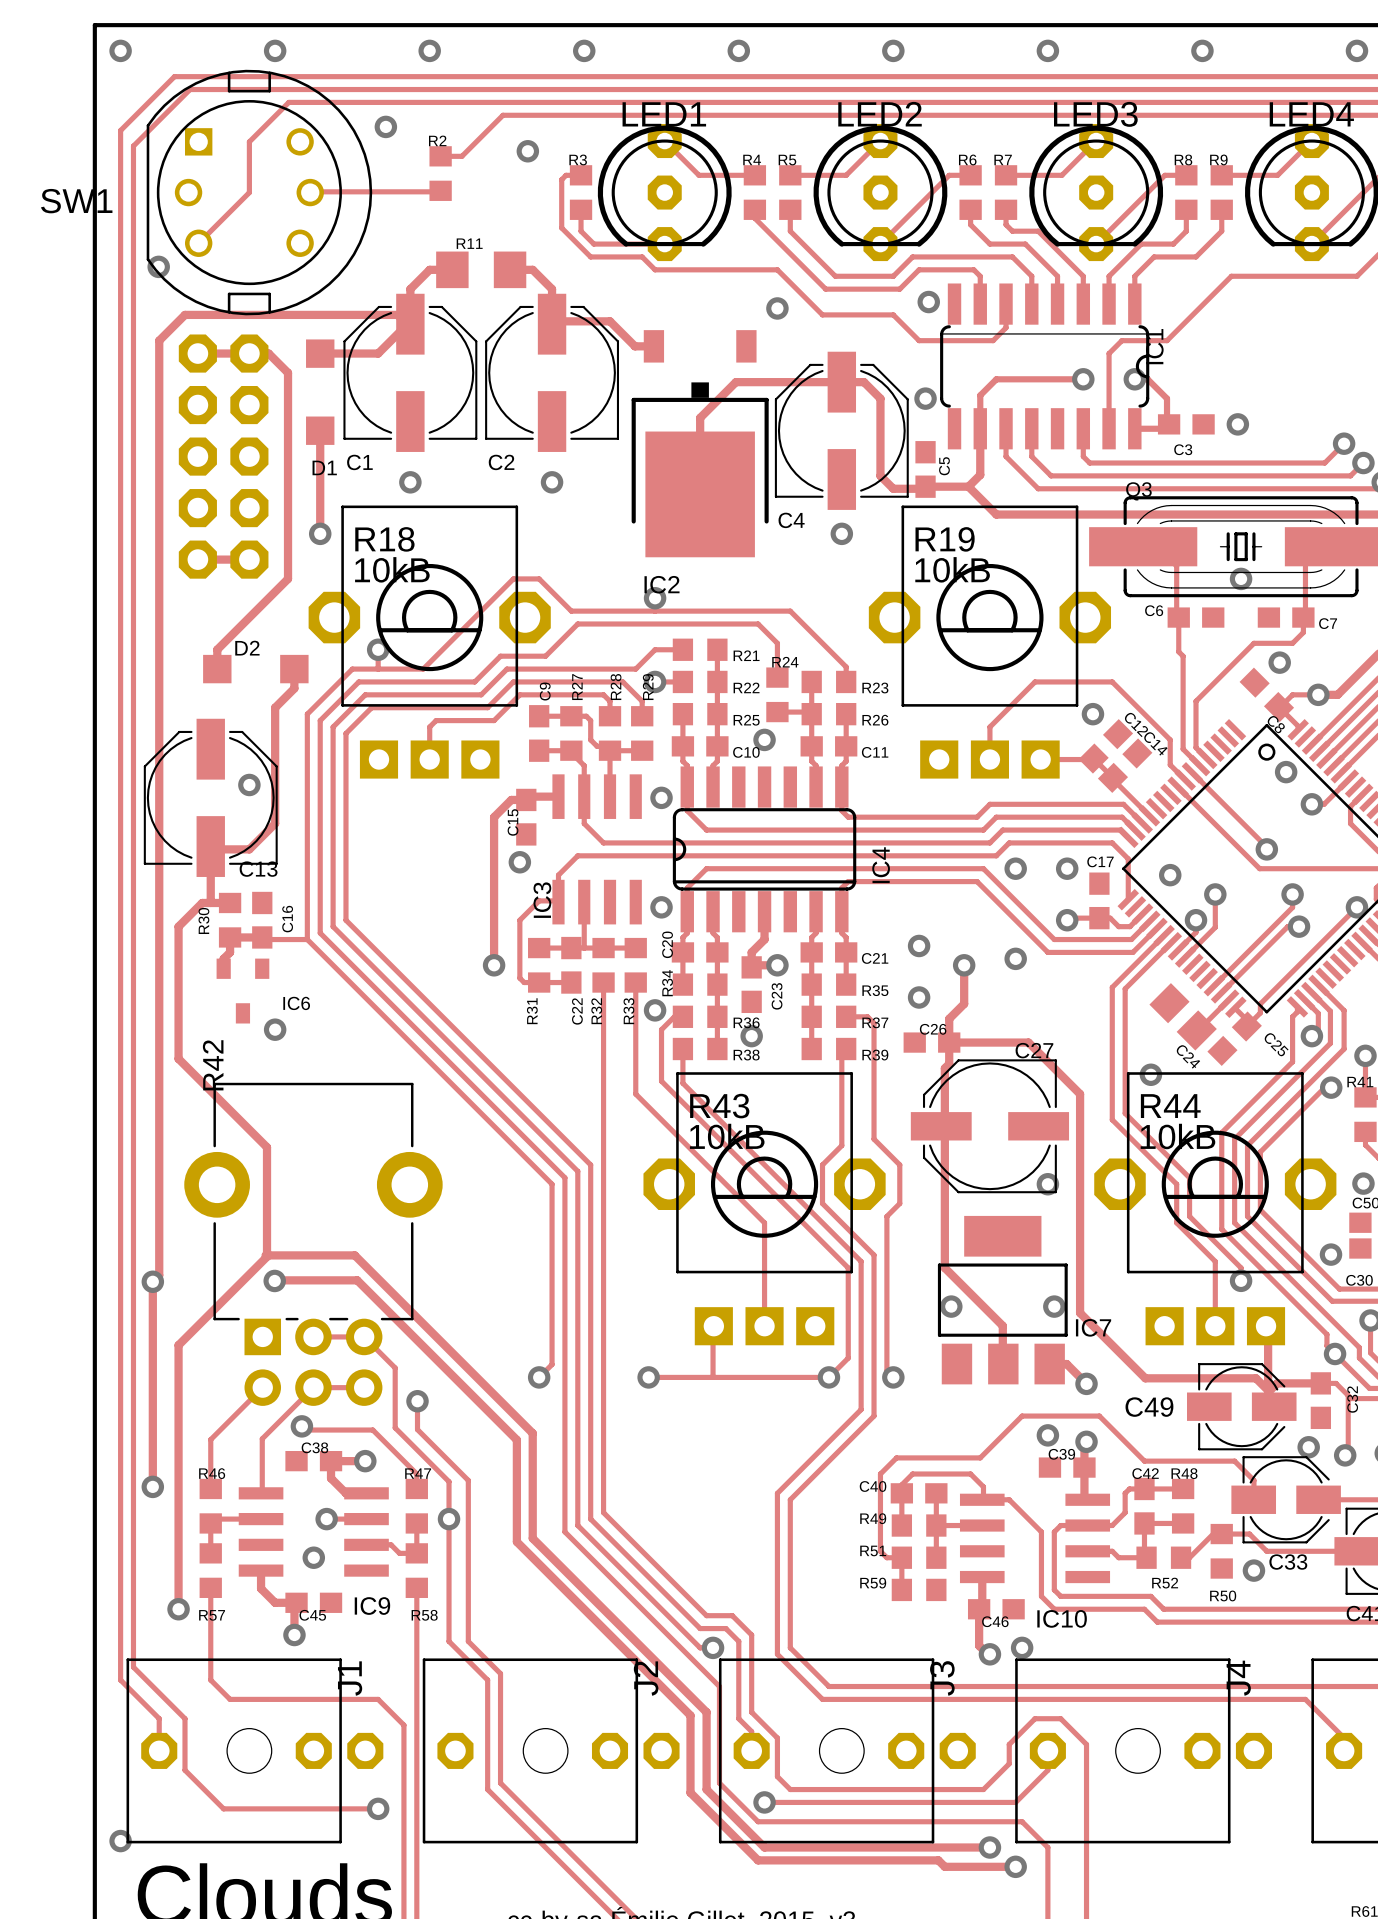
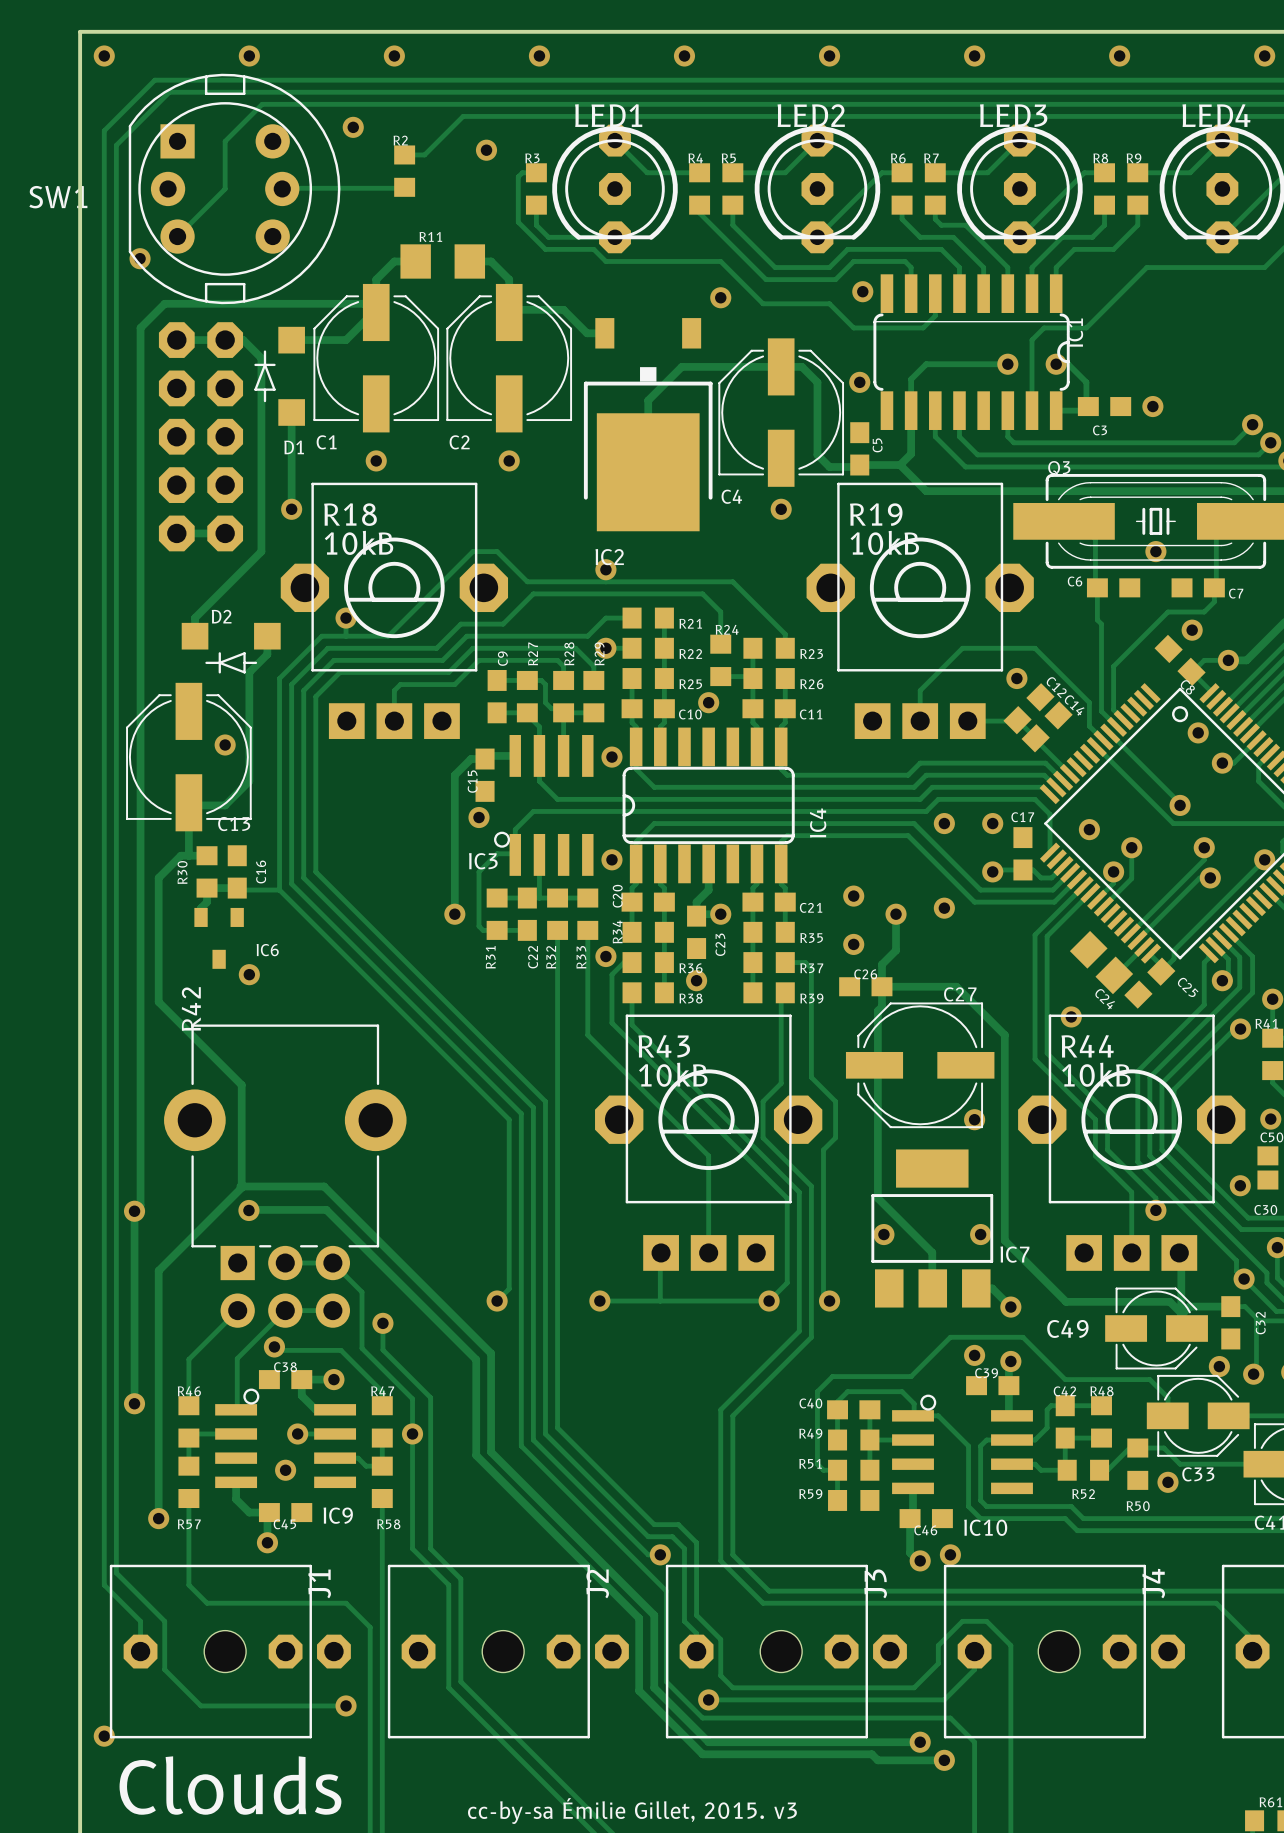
SW1 footprint: [146, 69, 373, 316] -> [128, 73, 341, 305]
D1 footprint: [306, 339, 335, 445] -> [254, 326, 305, 426]
D2 footprint: [203, 654, 309, 684] -> [181, 622, 281, 674]
IC3 footprint: [552, 774, 642, 925] -> [494, 734, 594, 876]
IC9 footprint: [238, 1487, 389, 1577] -> [215, 1388, 357, 1489]
IC10 footprint: [959, 1493, 1111, 1584] -> [892, 1394, 1033, 1495]

